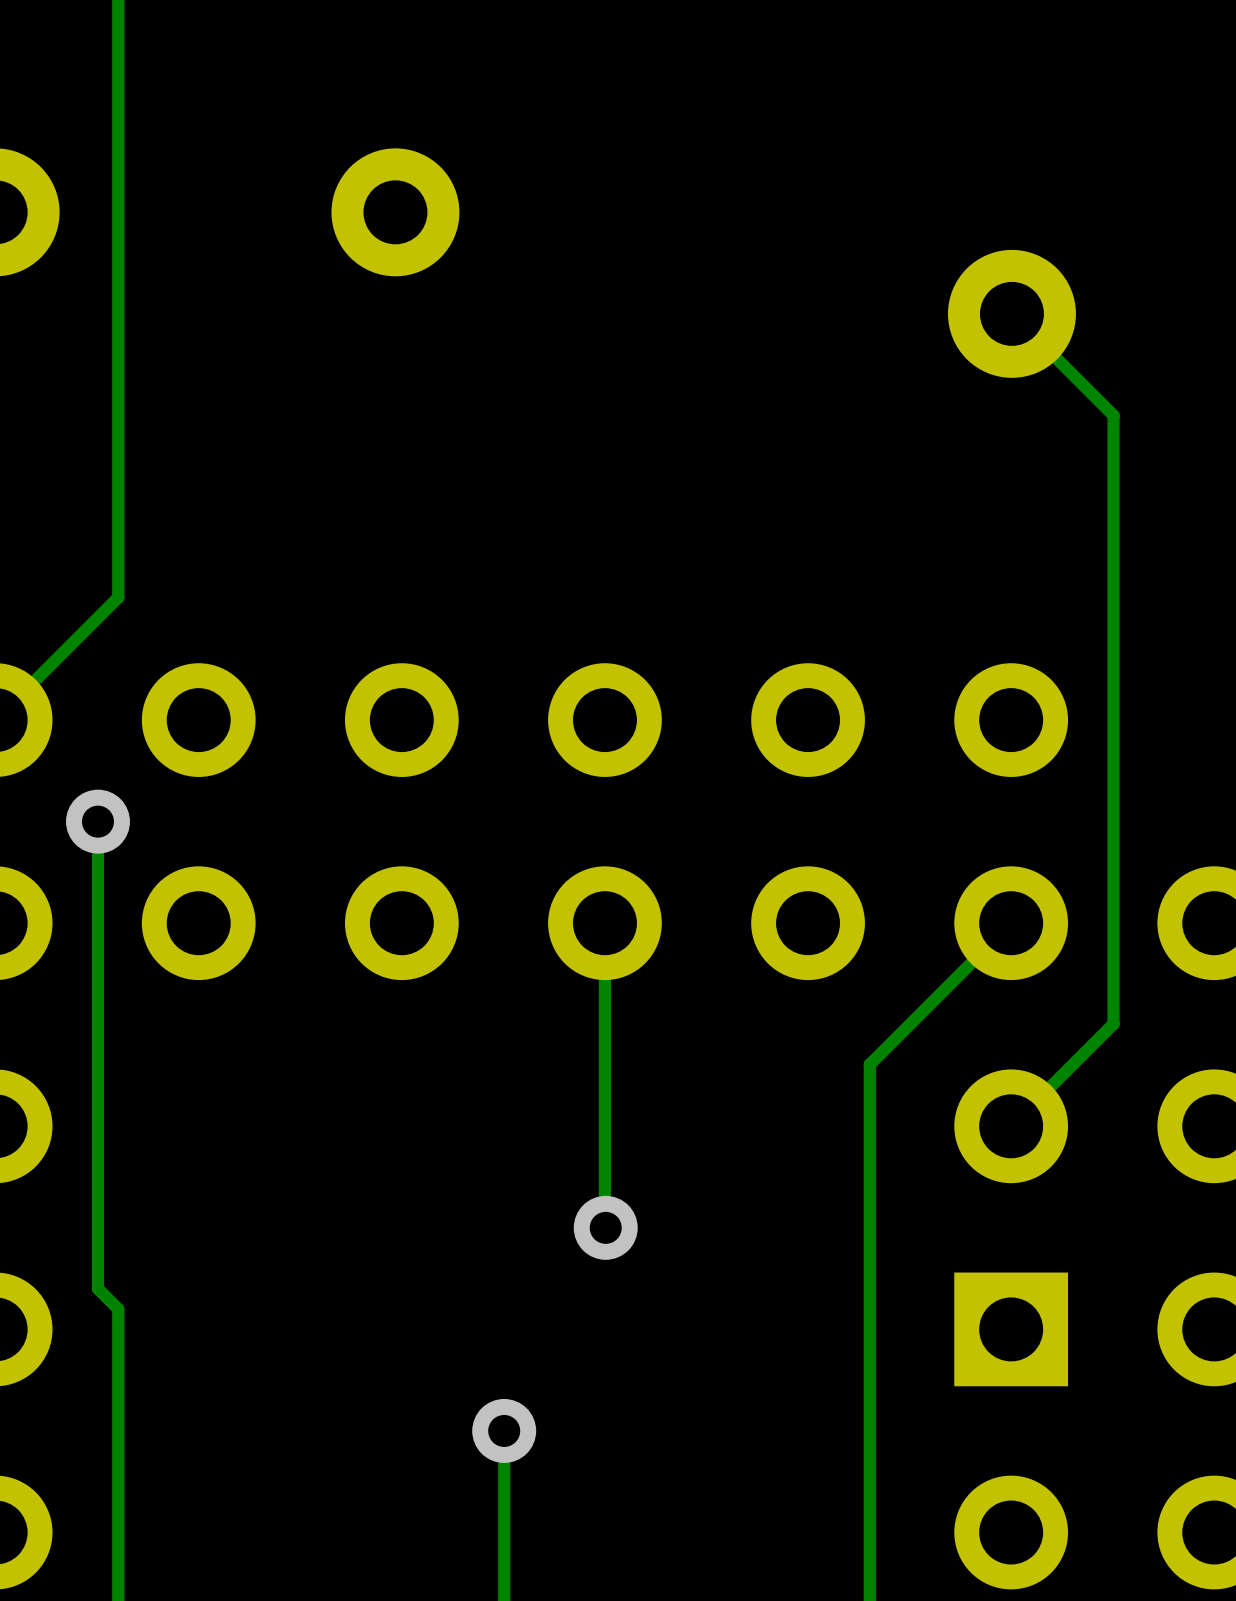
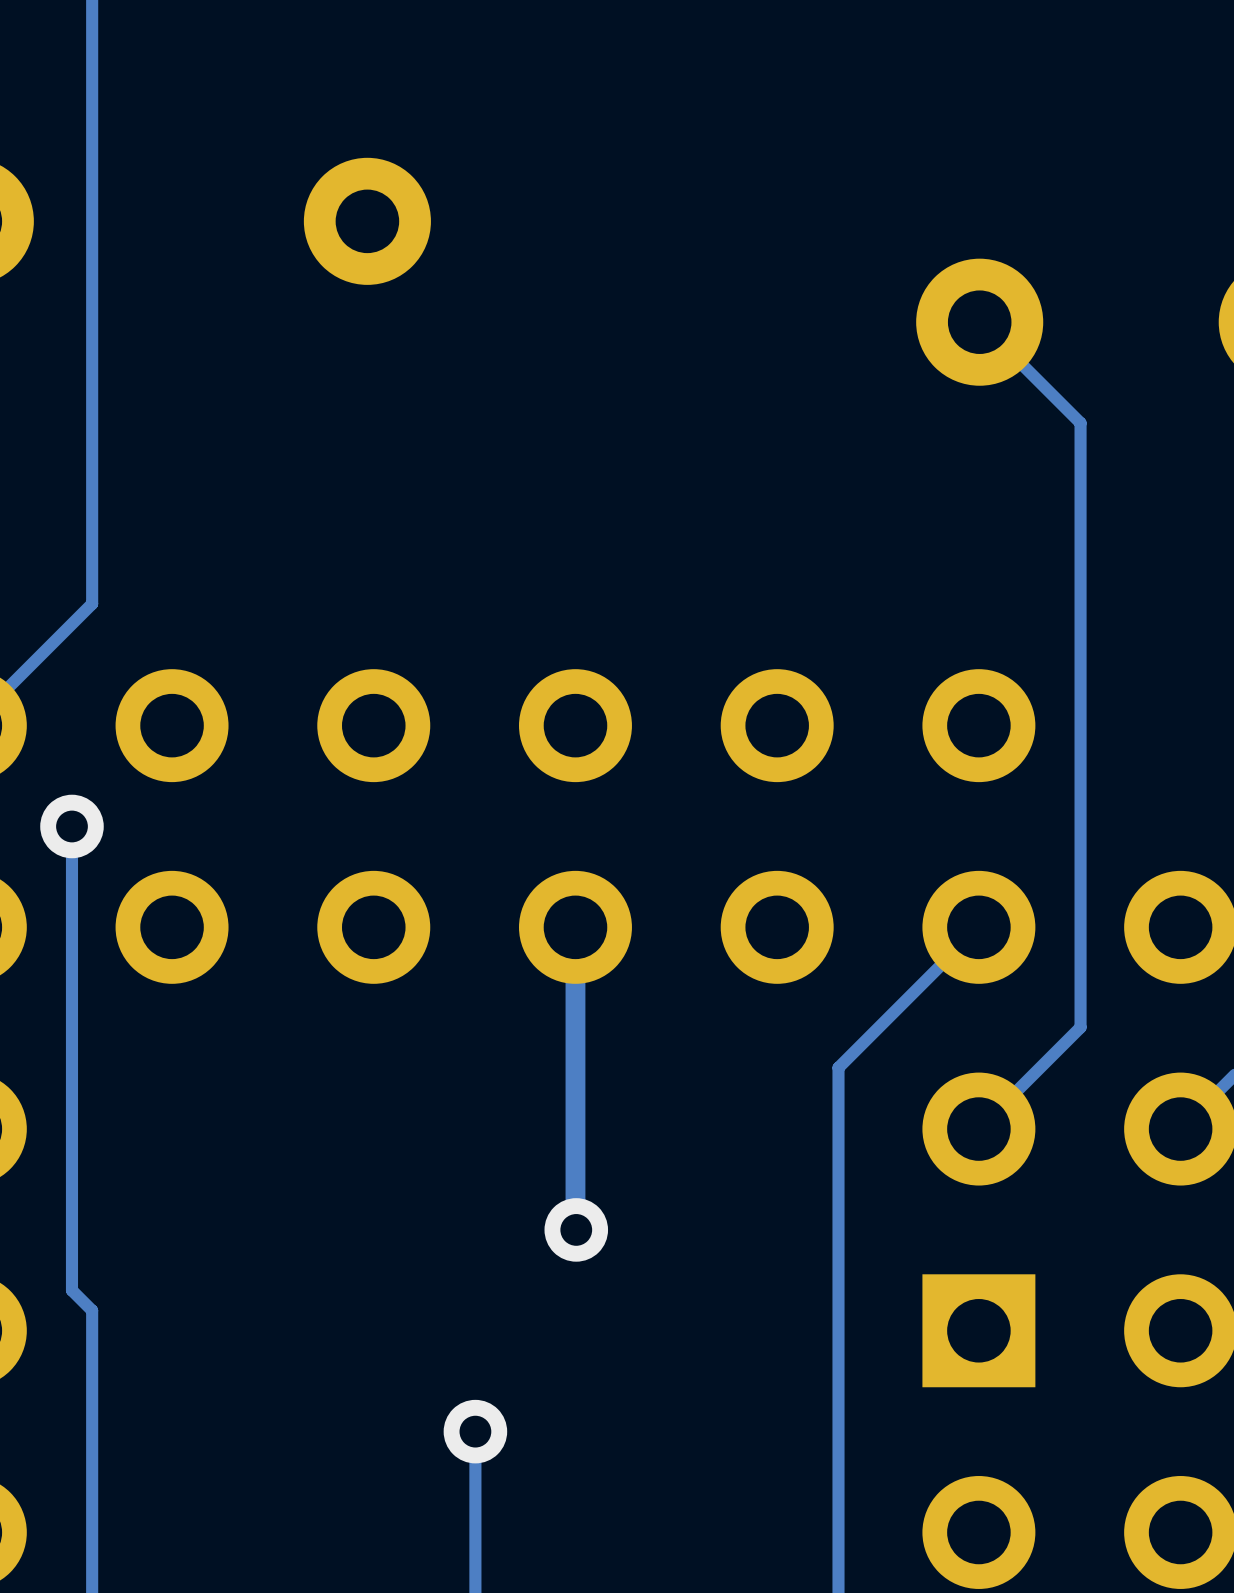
track width: thin (604, 923) (604, 1227) -> thick (575, 927) (575, 1229)

